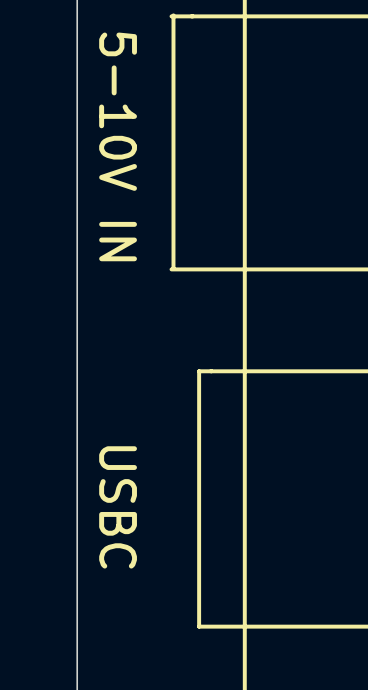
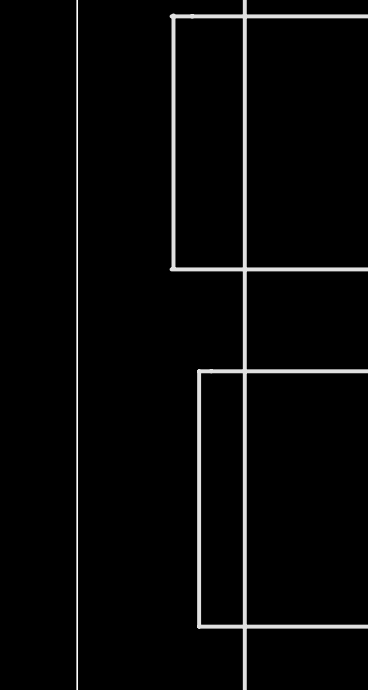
text: 5-10V IN (118, 146) -> none
text: USBC (118, 507) -> none

